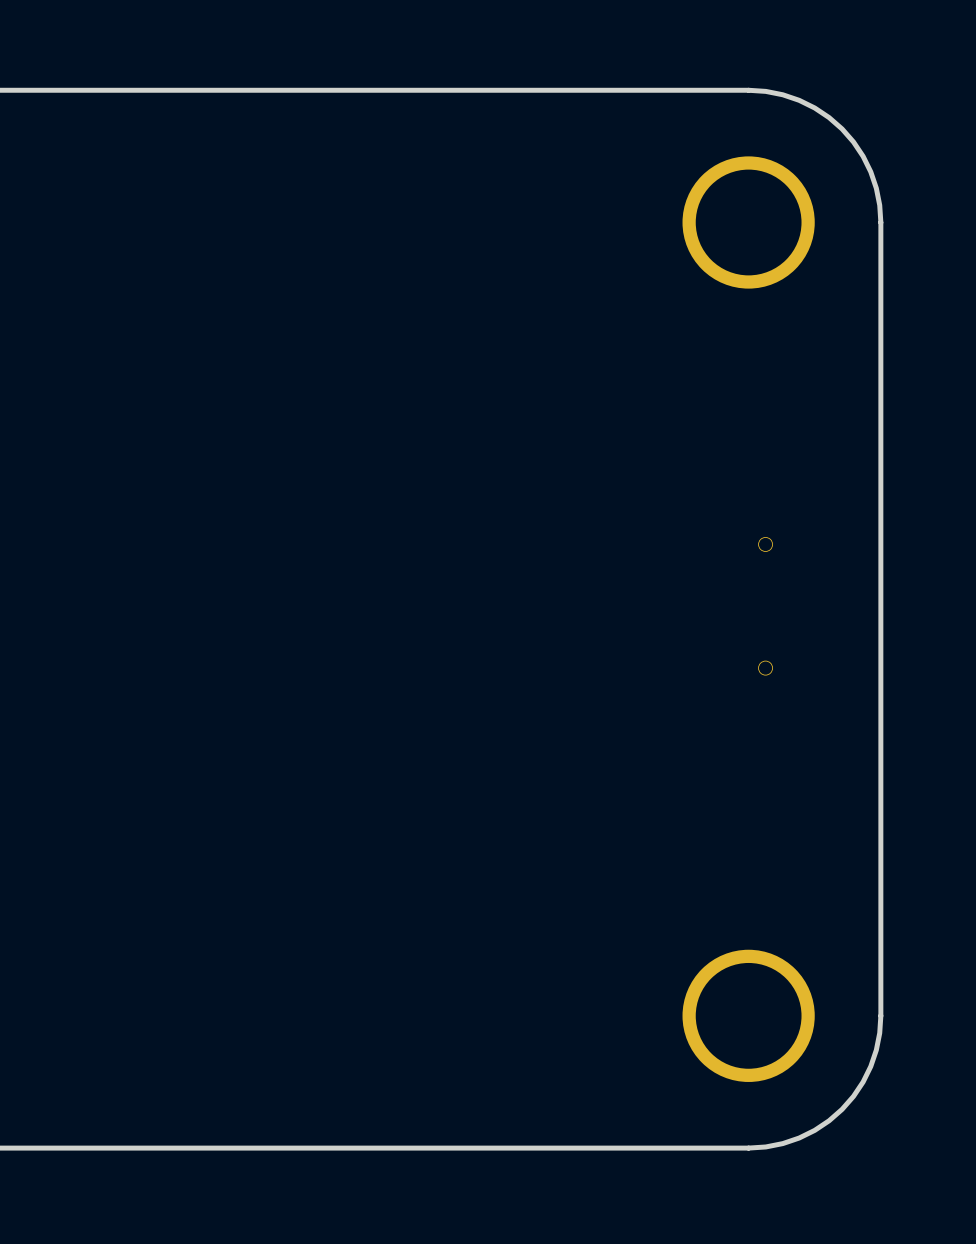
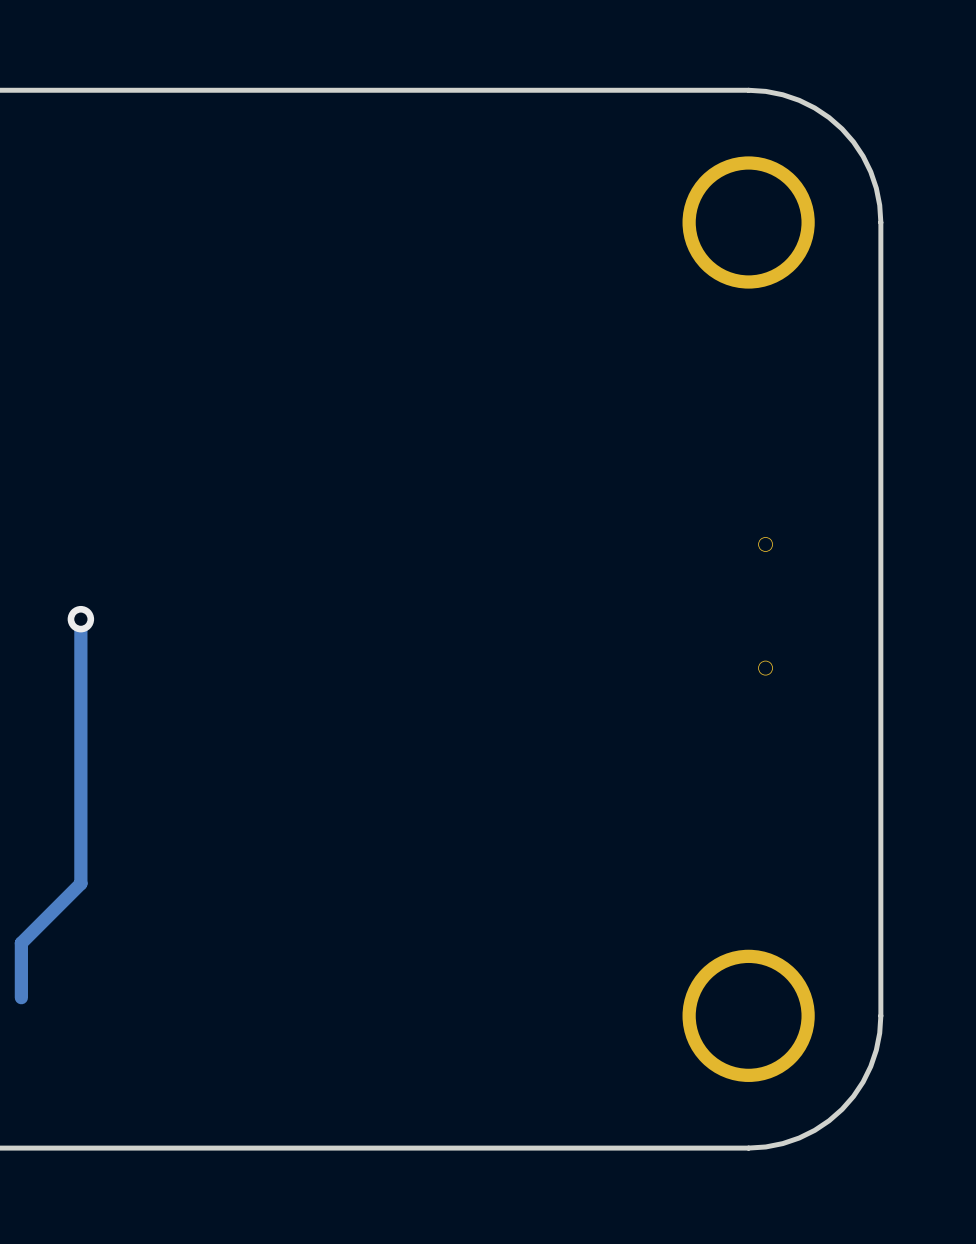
track: none -> (80, 619) (80, 883) (21, 943) (21, 997)
via: none -> (80, 619)

